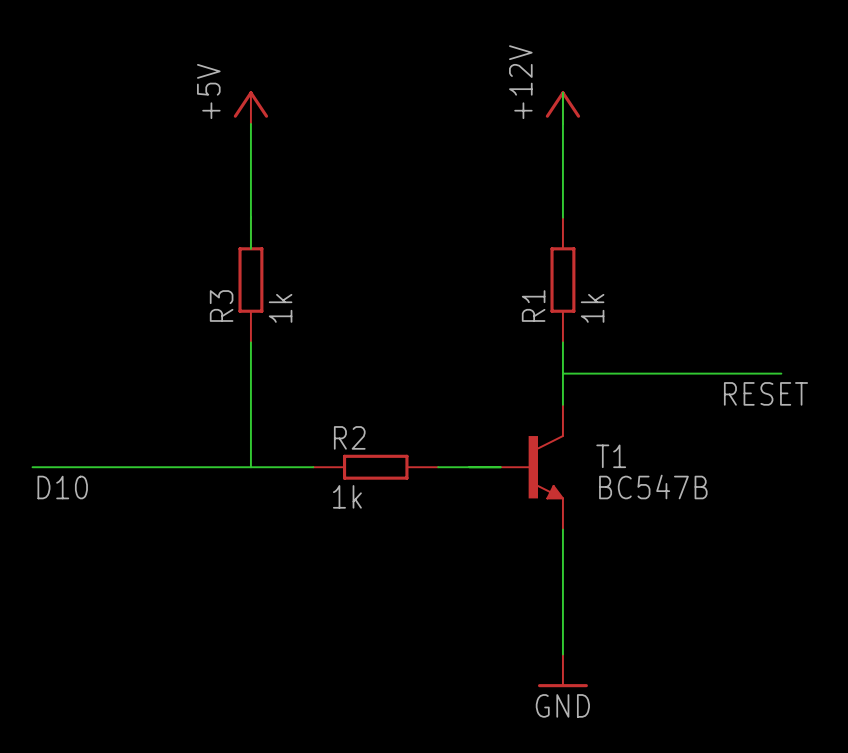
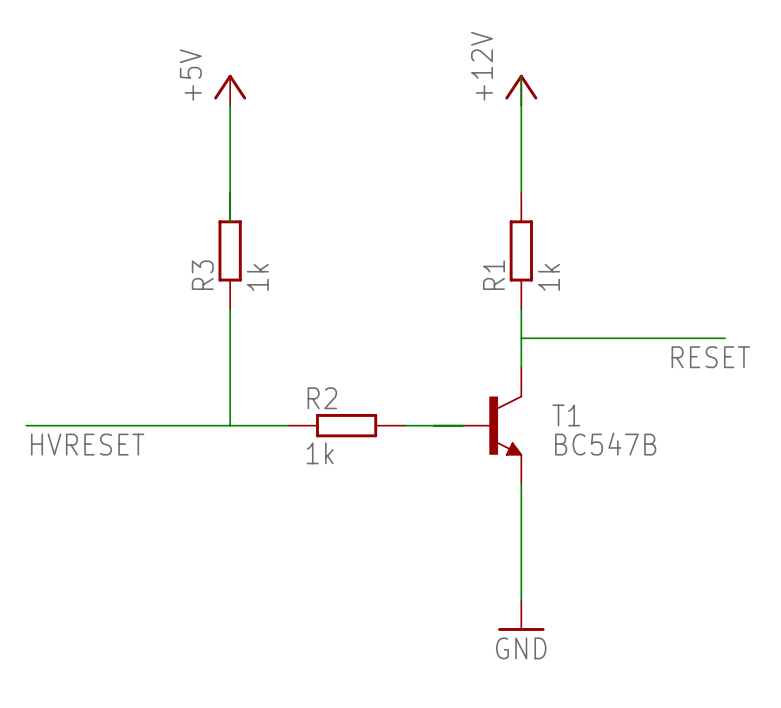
label: D10 (62, 487) -> HVRESET (87, 444)

